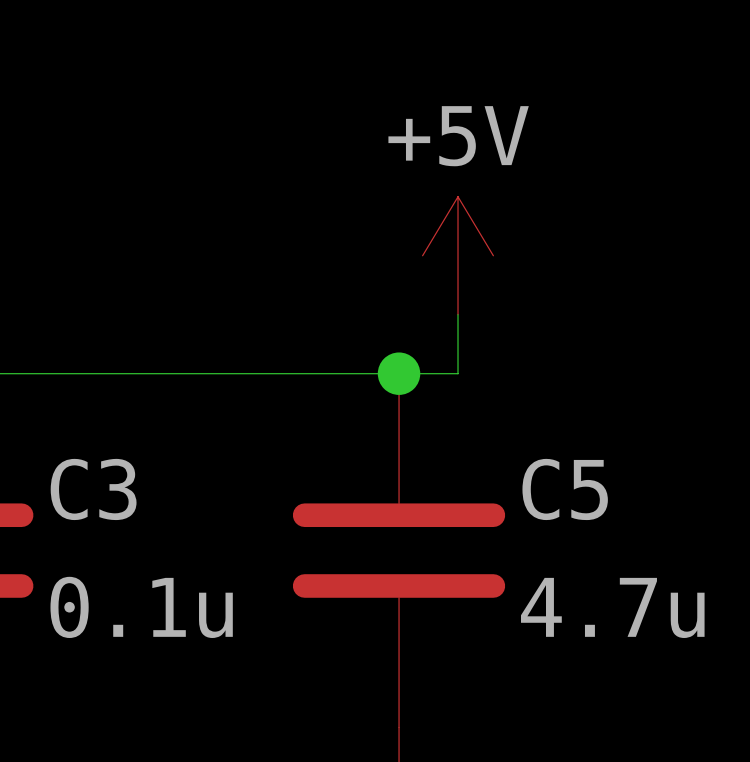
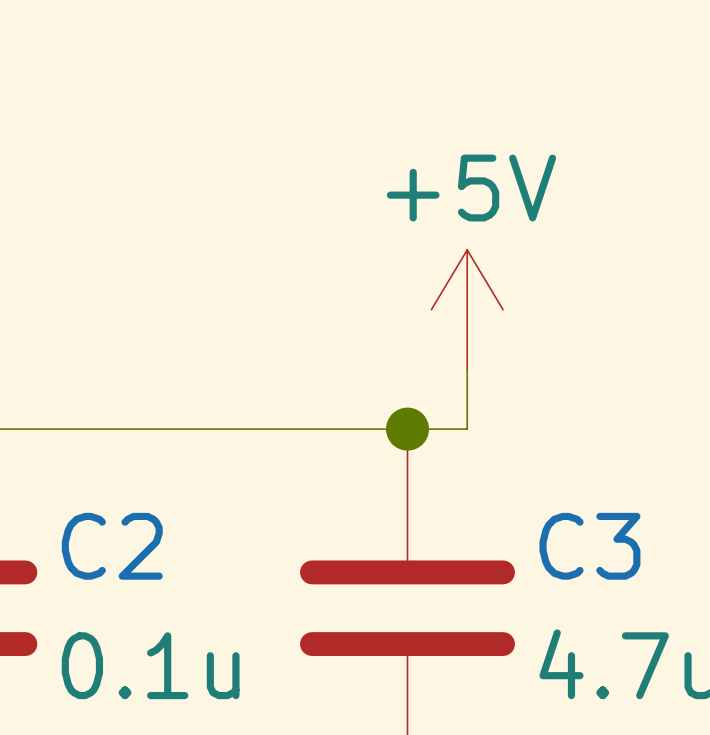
C3 name: C3 (93, 489) -> C2 (112, 546)
C5 name: C5 (565, 489) -> C3 (589, 546)

